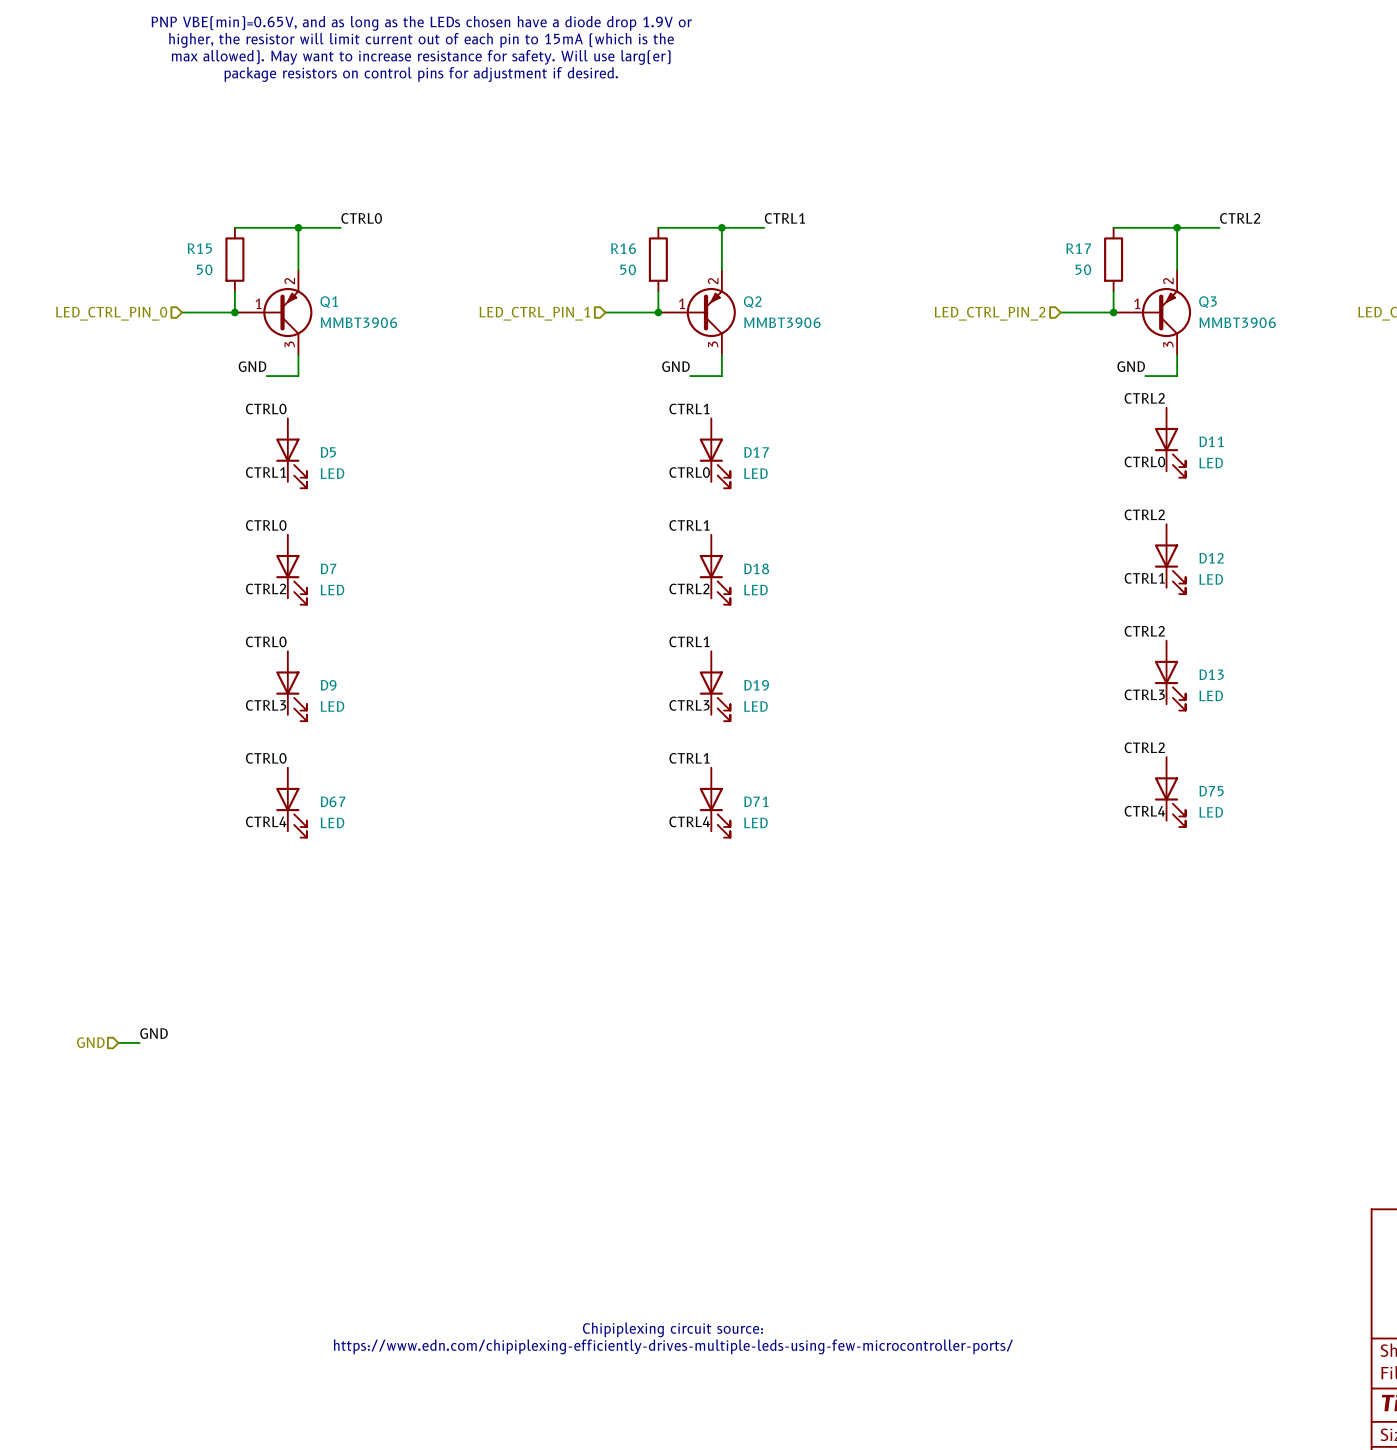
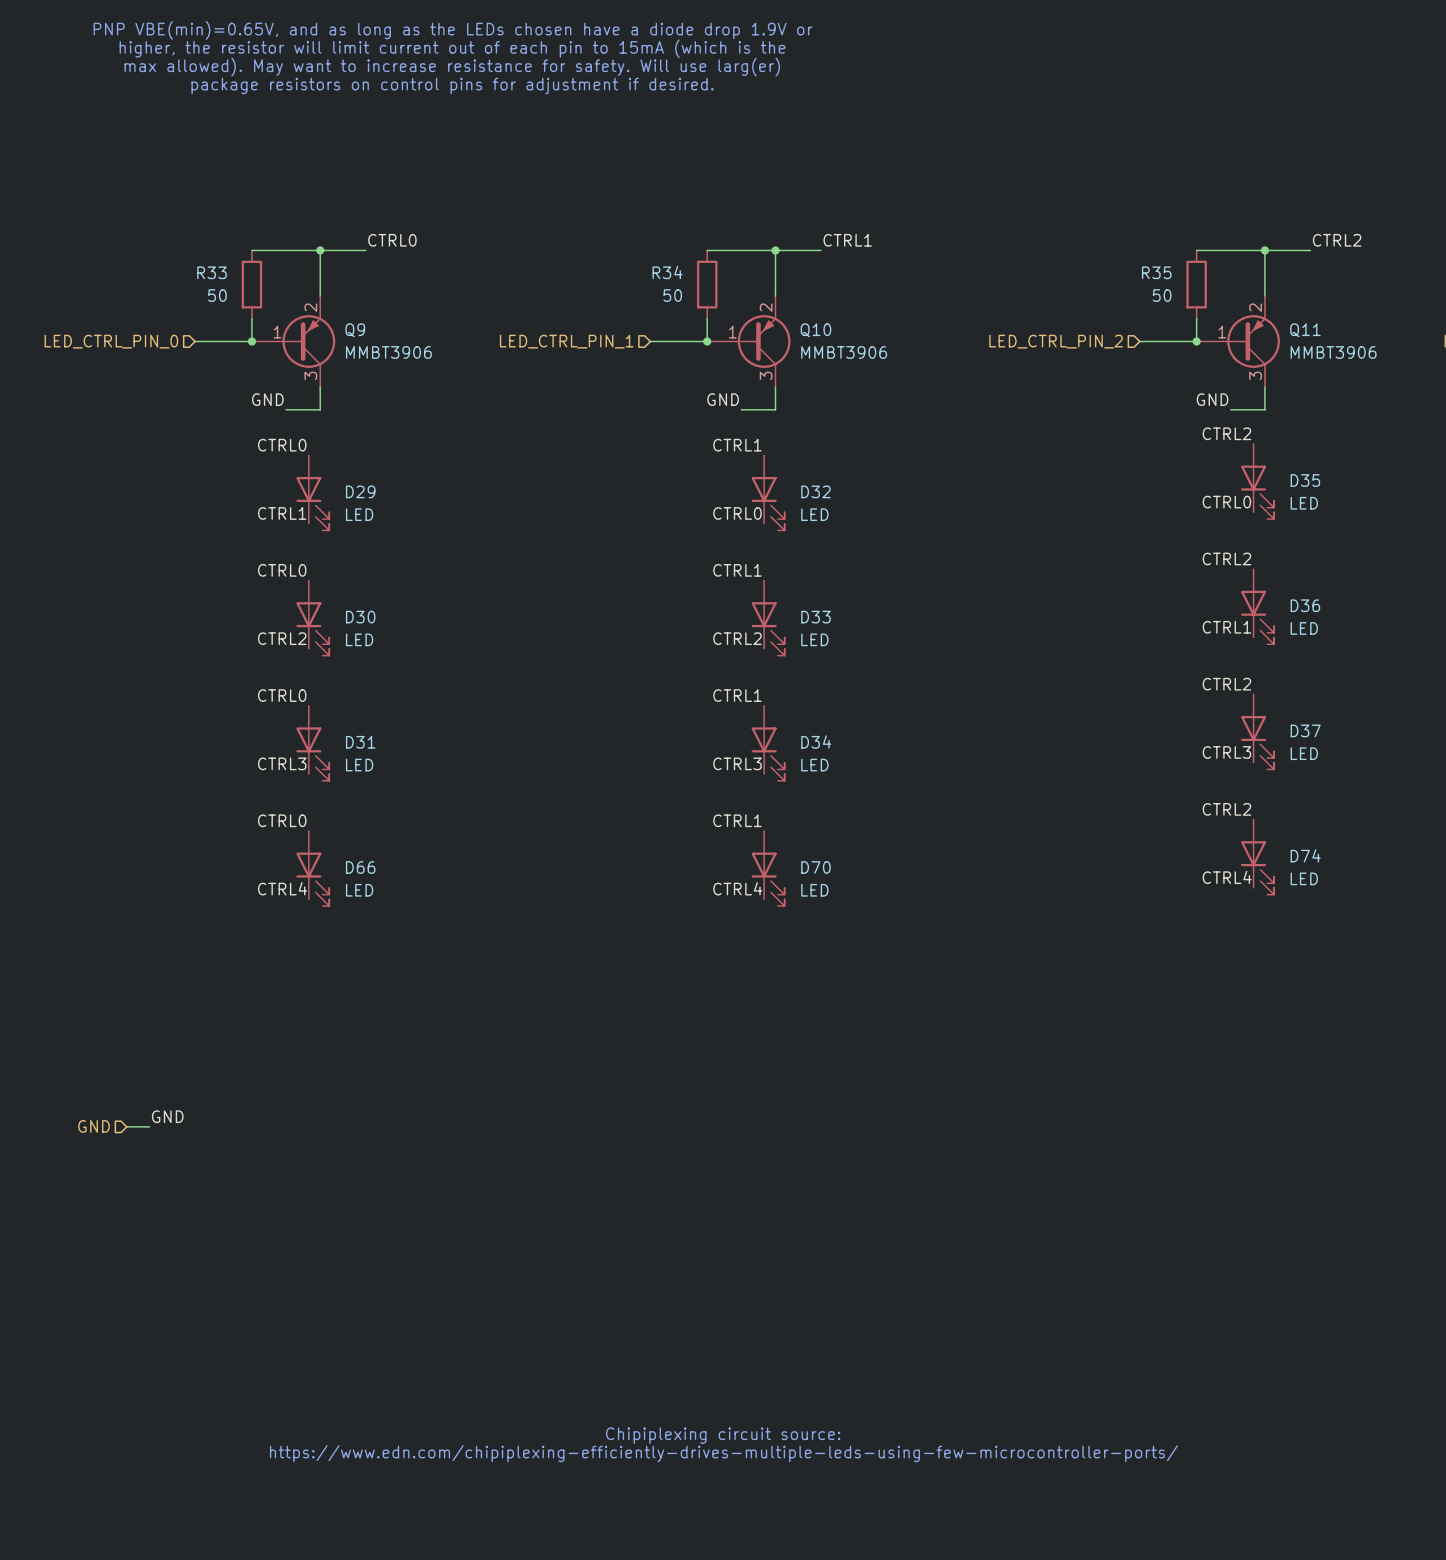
R15 name: R15 (199, 248) -> R33 (212, 272)
R16 name: R16 (623, 248) -> R34 (667, 272)
R17 name: R17 (1078, 248) -> R35 (1156, 272)
Q1 name: Q1 (329, 302) -> Q9 (355, 330)
Q2 name: Q2 (752, 302) -> Q10 (815, 330)
Q3 name: Q3 (1207, 302) -> Q11 (1305, 330)
D11 name: D11 (1211, 441) -> D35 (1305, 480)
D5 name: D5 (328, 452) -> D29 (360, 491)
D17 name: D17 (756, 452) -> D32 (815, 491)
D12 name: D12 (1211, 558) -> D36 (1305, 605)
D7 name: D7 (328, 568) -> D30 (360, 617)
D18 name: D18 (756, 568) -> D33 (815, 617)
D13 name: D13 (1211, 674) -> D37 (1305, 730)
D9 name: D9 (328, 685) -> D31 (360, 742)
D19 name: D19 (756, 685) -> D34 (816, 742)
D75 name: D75 (1211, 791) -> D74 (1305, 855)
D67 name: D67 (333, 801) -> D66 (360, 867)
D71 name: D71 (756, 801) -> D70 (815, 867)

